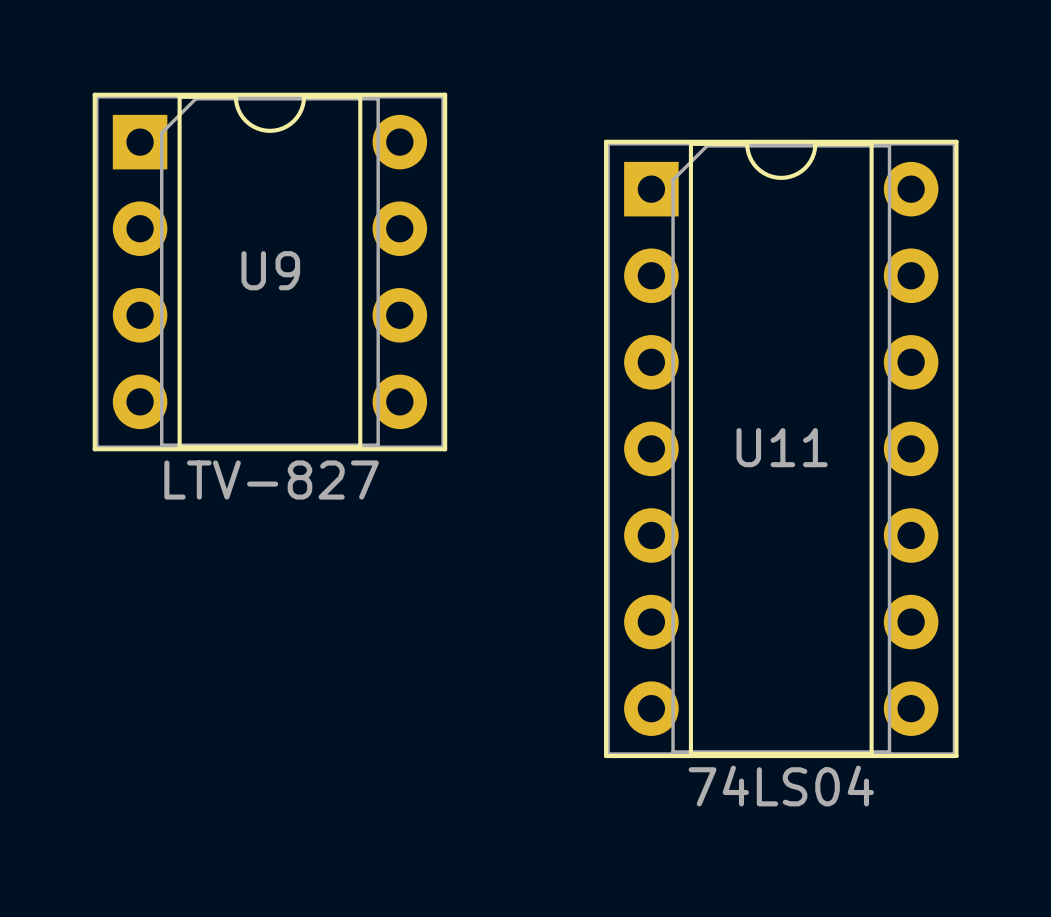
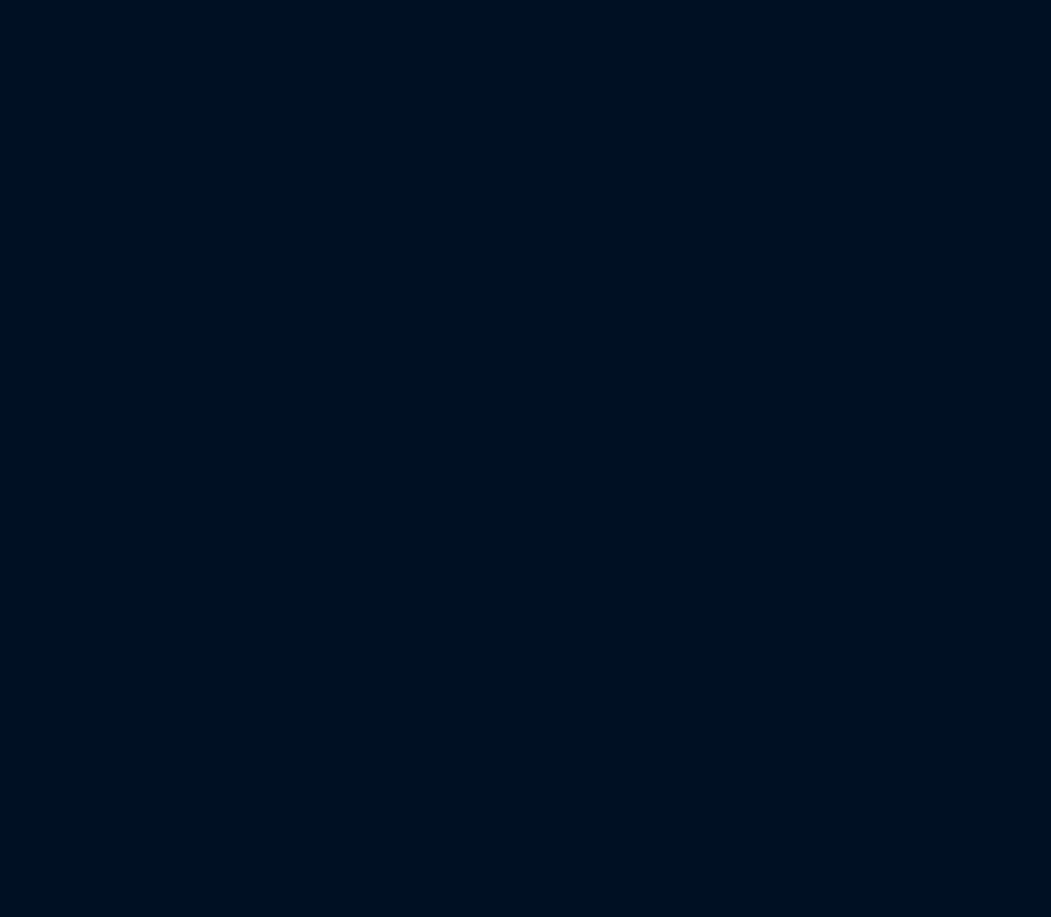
U9: LTV-827 (269, 271) -> none
U11: 74LS04 (781, 448) -> none

